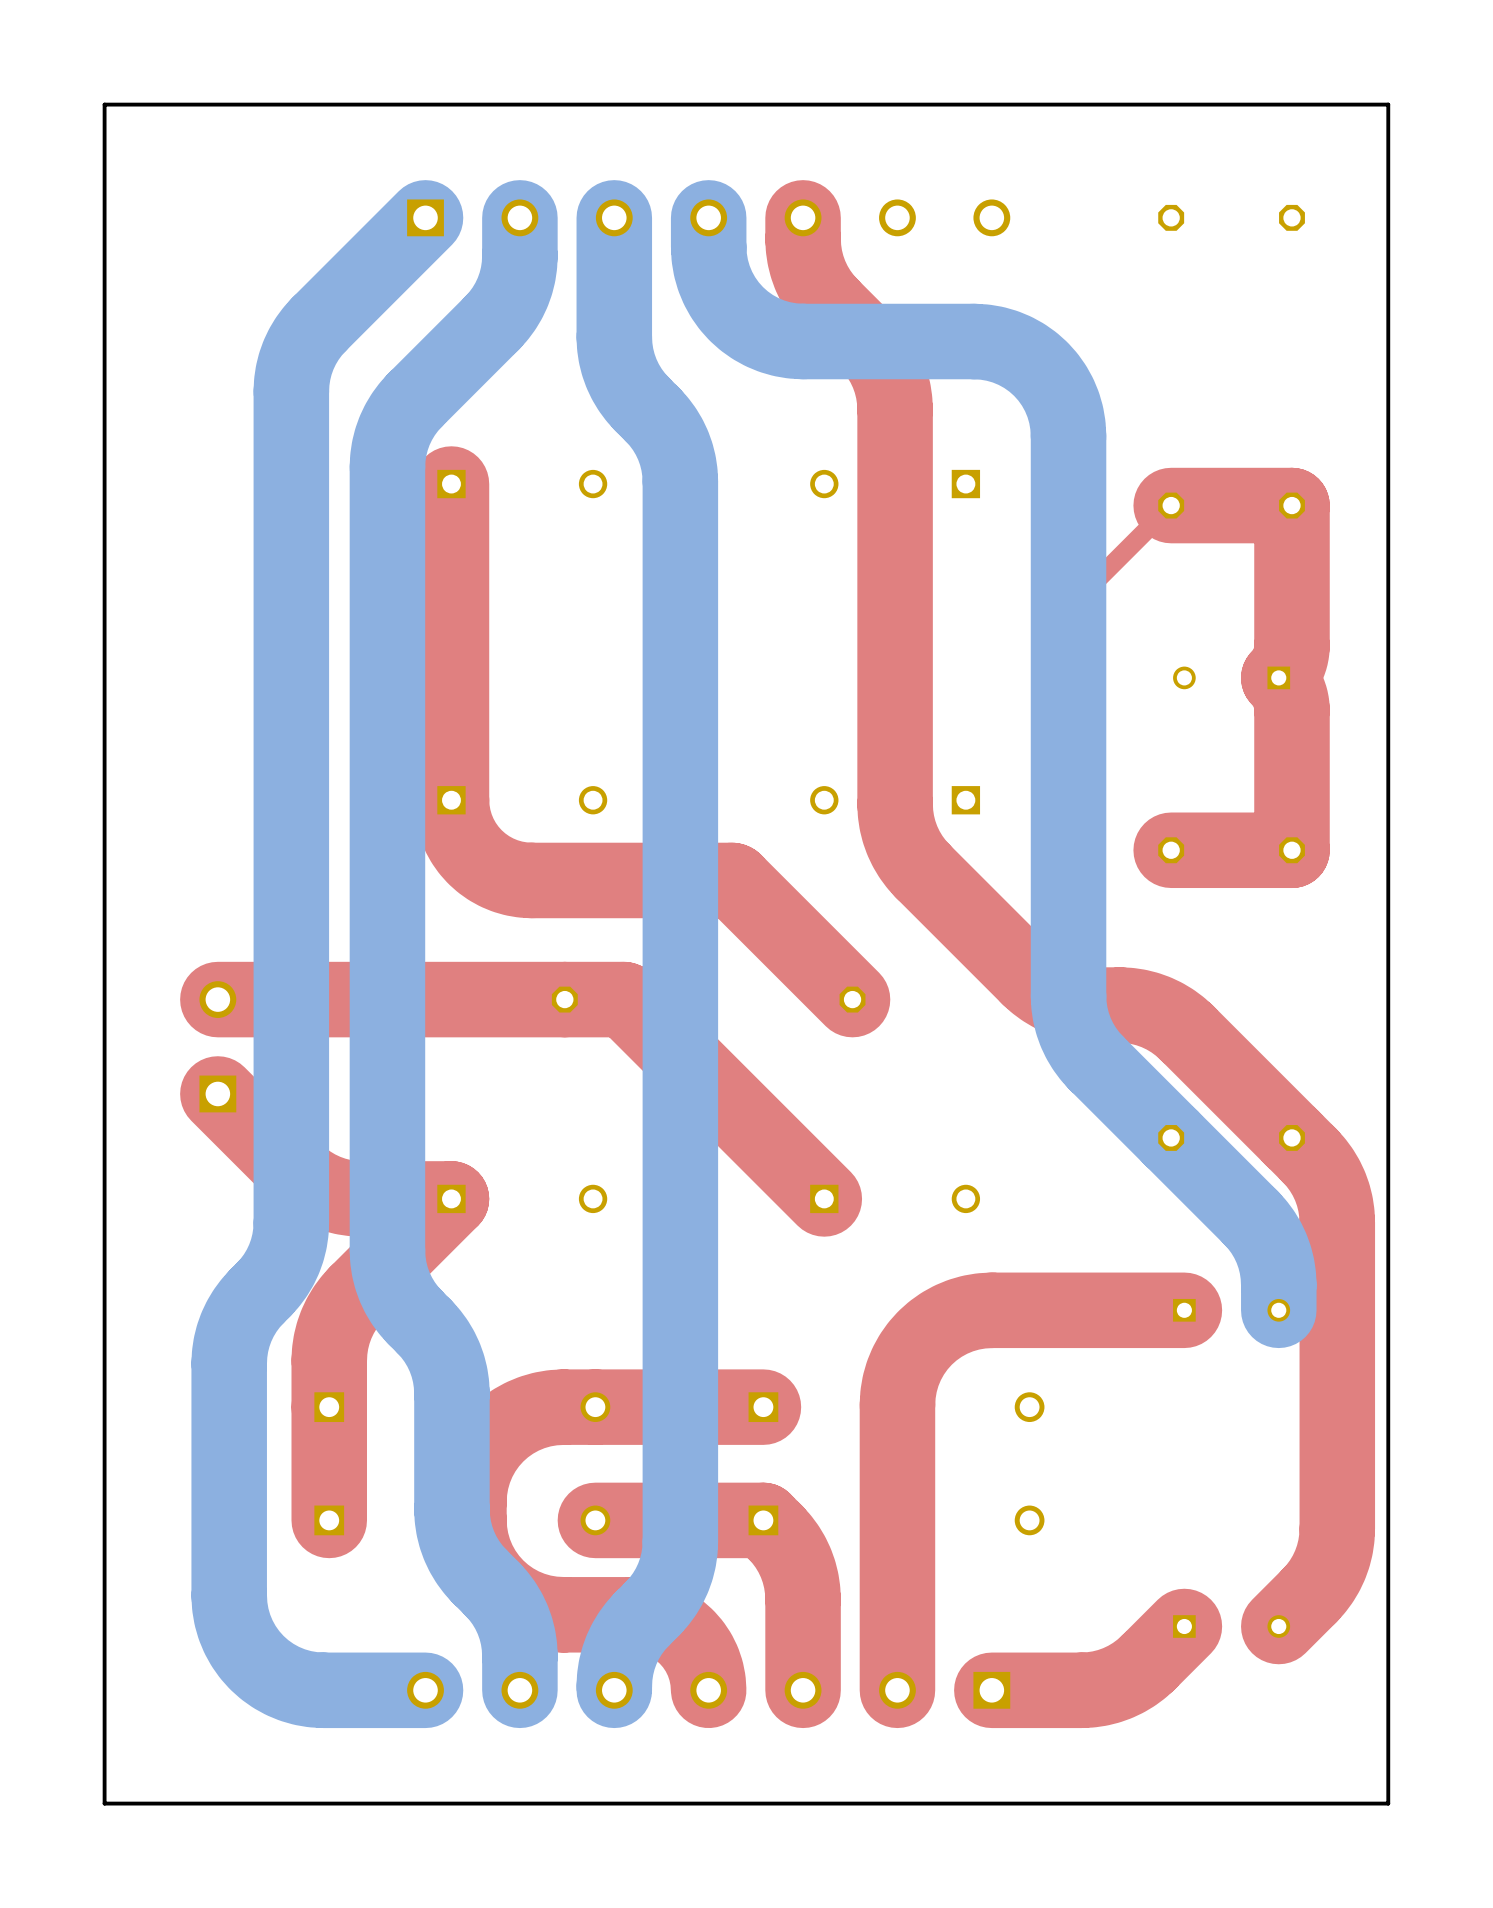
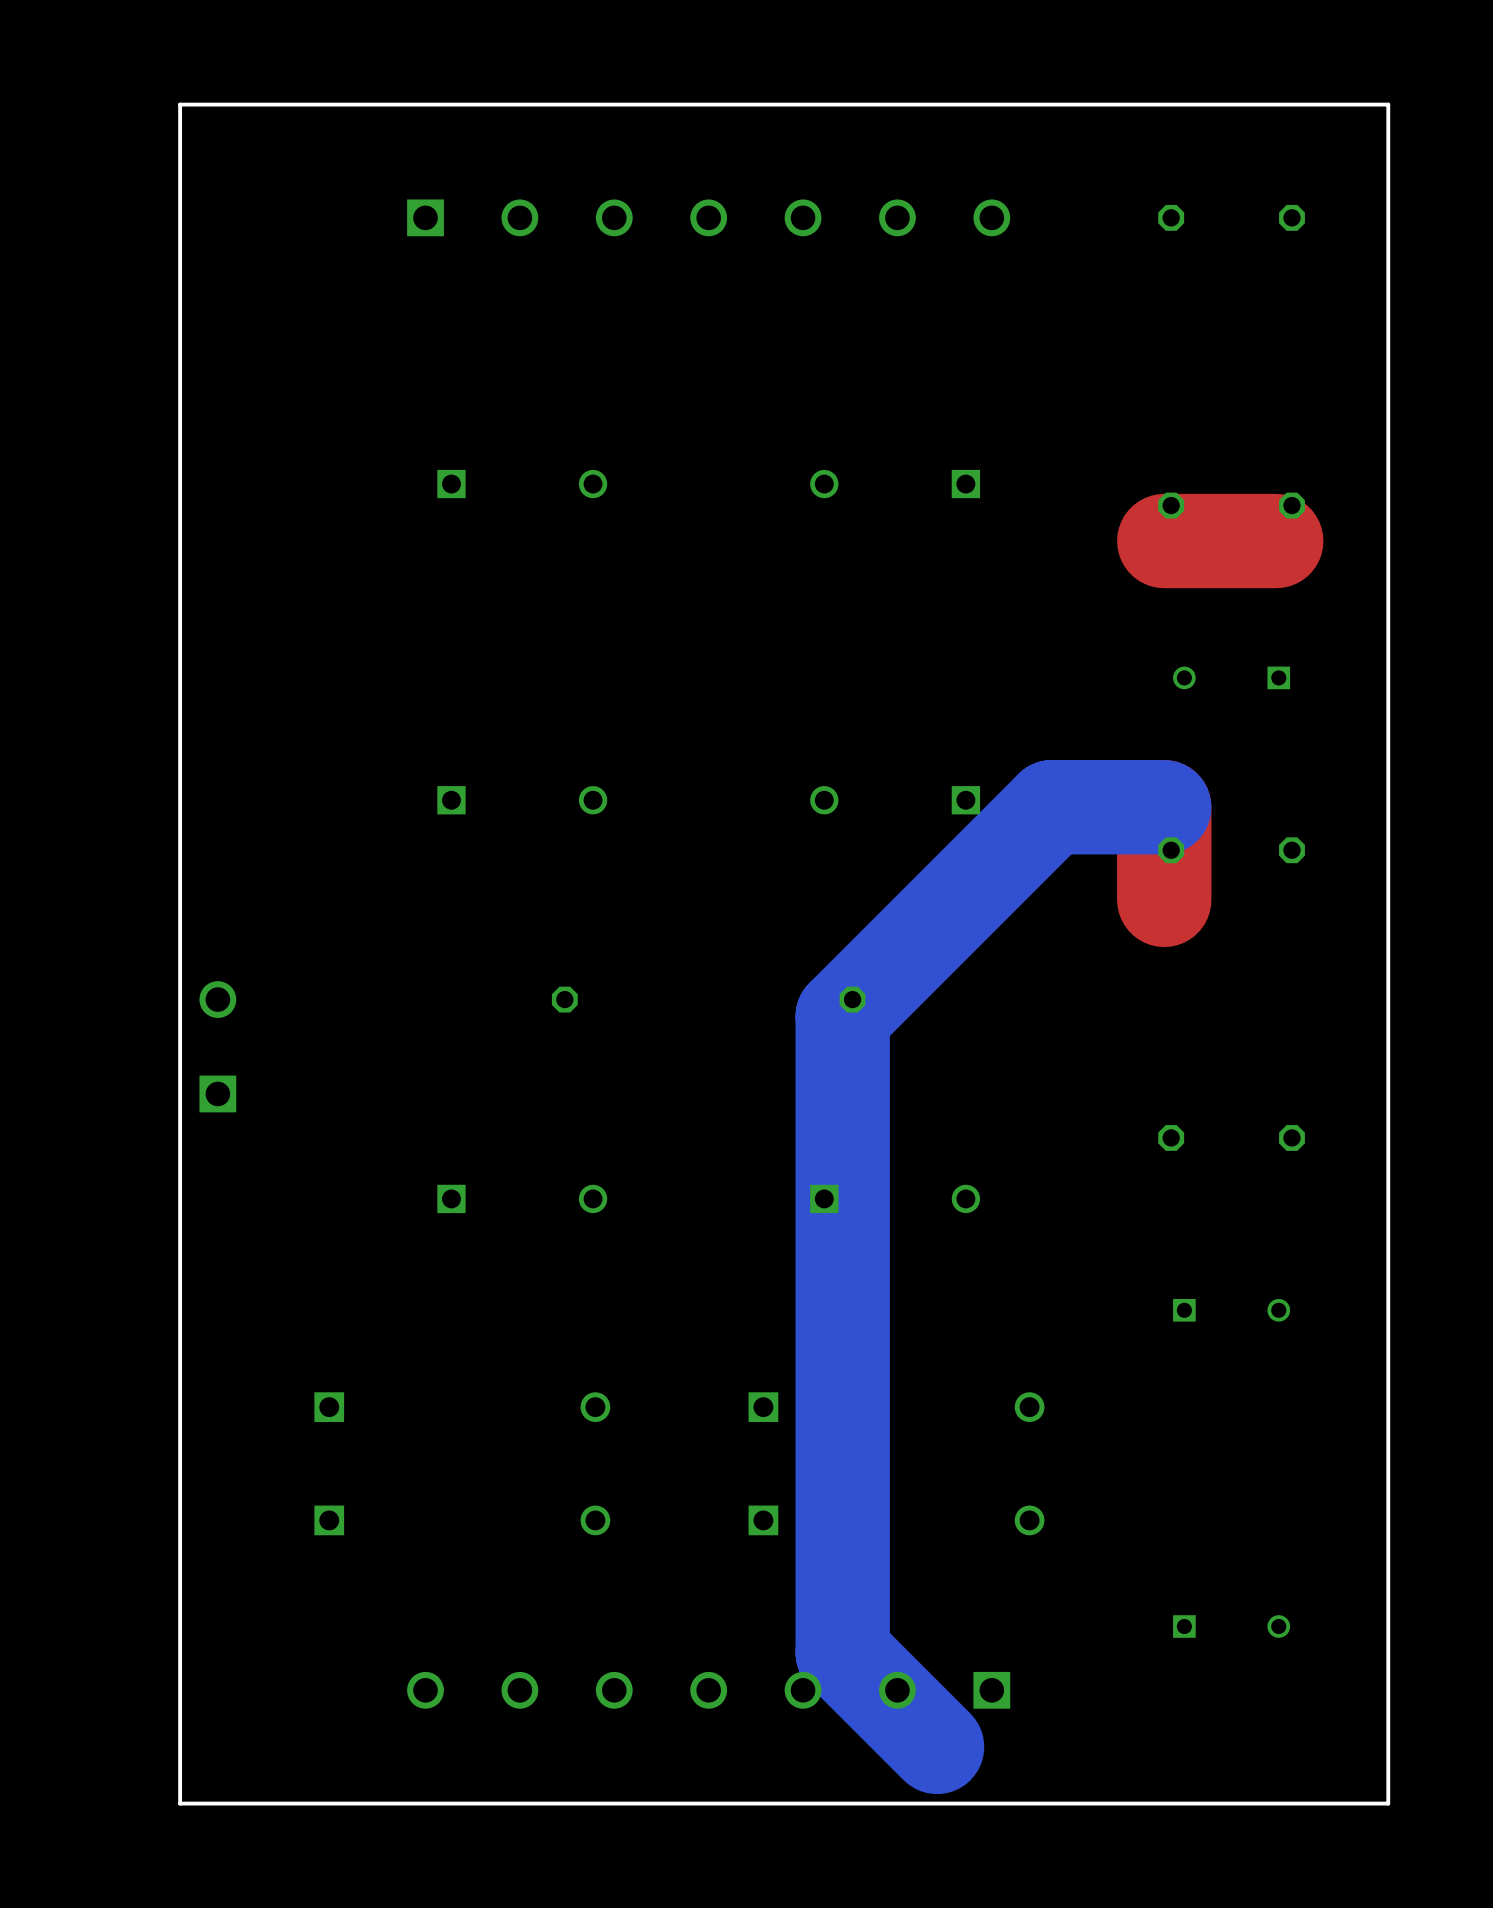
board edge: (180, 104) (104, 104) (104, 1803) (180, 1803) -> (180, 104) (180, 1803)
bottom track: (425, 217) (312, 331) (302, 346) (293, 372) (291, 391) (290, 1232) (287, 1250) (280, 1267) (269, 1282) (245, 1310) (236, 1327) (231, 1344) (229, 1363) (229, 1595) (234, 1627) (243, 1646) (256, 1662) (273, 1675) (302, 1687) (323, 1690) (425, 1690) -> none
bottom track: (519, 217) (519, 265) (515, 283) (508, 300) (492, 322) (415, 400) (403, 414) (391, 439) (387, 466) (387, 1259) (391, 1278) (398, 1295) (408, 1310) (436, 1340) (447, 1365) (451, 1393) (451, 1509) (453, 1528) (459, 1545) (467, 1562) (498, 1595) (512, 1619) (519, 1646) (519, 1690) -> none
bottom track: (614, 217) (614, 337) (618, 364) (630, 389) (658, 421) (669, 437) (676, 454) (680, 481) (679, 1550) (676, 1569) (669, 1586) (658, 1601) (635, 1626) (621, 1649) (616, 1667) (614, 1690) -> none
bottom track: (708, 217) (709, 257) (718, 288) (736, 313) (762, 332) (782, 339) (803, 341) (974, 341) (995, 343) (1015, 350) (1032, 362) (1047, 377) (1059, 394) (1066, 414) (1068, 435) (1068, 996) (1070, 1014) (1075, 1032) (1089, 1056) (1251, 1217) (1262, 1232) (1271, 1248) (1276, 1266) (1278, 1310) -> none
top track: (803, 217) (804, 257) (814, 283) (824, 299) (879, 356) (887, 373) (893, 390) (895, 409) (895, 804) (896, 822) (906, 848) (922, 871) (1028, 977) (1043, 989) (1059, 997) (1077, 1003) (1129, 1005) (1147, 1009) (1164, 1016) (1179, 1026) (1309, 1155) (1326, 1177) (1333, 1194) (1337, 1222) (1336, 1538) (1333, 1556) (1321, 1581) (1278, 1626) -> none
top track: (451, 484) (451, 800) (455, 826) (468, 850) (489, 868) (505, 875) (522, 879) (733, 880) (852, 999) -> none
top track: none -> (1276, 541) (1164, 541)
top track: (1067, 648) (1067, 609) (1171, 505) (1291, 505) (1291, 651) (1288, 663) (1278, 677) (1285, 687) (1291, 703) (1291, 850) (1171, 850) -> none
top track: none -> (1164, 807) (1164, 899)
bottom track: none -> (1164, 807) (1051, 807) (842, 1016) (842, 1652) (937, 1746)
top track: (217, 999) (624, 999) (824, 1198) -> none
top track: (217, 1093) (302, 1177) (325, 1191) (352, 1198) (451, 1198) (356, 1293) (345, 1307) (336, 1324) (331, 1341) (329, 1360) (329, 1520) -> none
top track: (1184, 1310) (981, 1310) (960, 1315) (941, 1324) (918, 1345) (906, 1363) (898, 1394) (897, 1690) -> none
top track: (763, 1407) (563, 1407) (542, 1409) (522, 1416) (496, 1434) (478, 1460) (471, 1480) (468, 1520) (474, 1551) (489, 1579) (504, 1594) (532, 1609) (552, 1614) (633, 1614) (662, 1620) (679, 1630) (698, 1652) (706, 1670) (708, 1690) -> none
top track: (595, 1520) (763, 1520) (787, 1546) (795, 1563) (801, 1580) (803, 1599) (803, 1690) -> none
top track: (1184, 1626) (1141, 1668) (1125, 1679) (1108, 1686) (1081, 1690) (991, 1690) -> none

